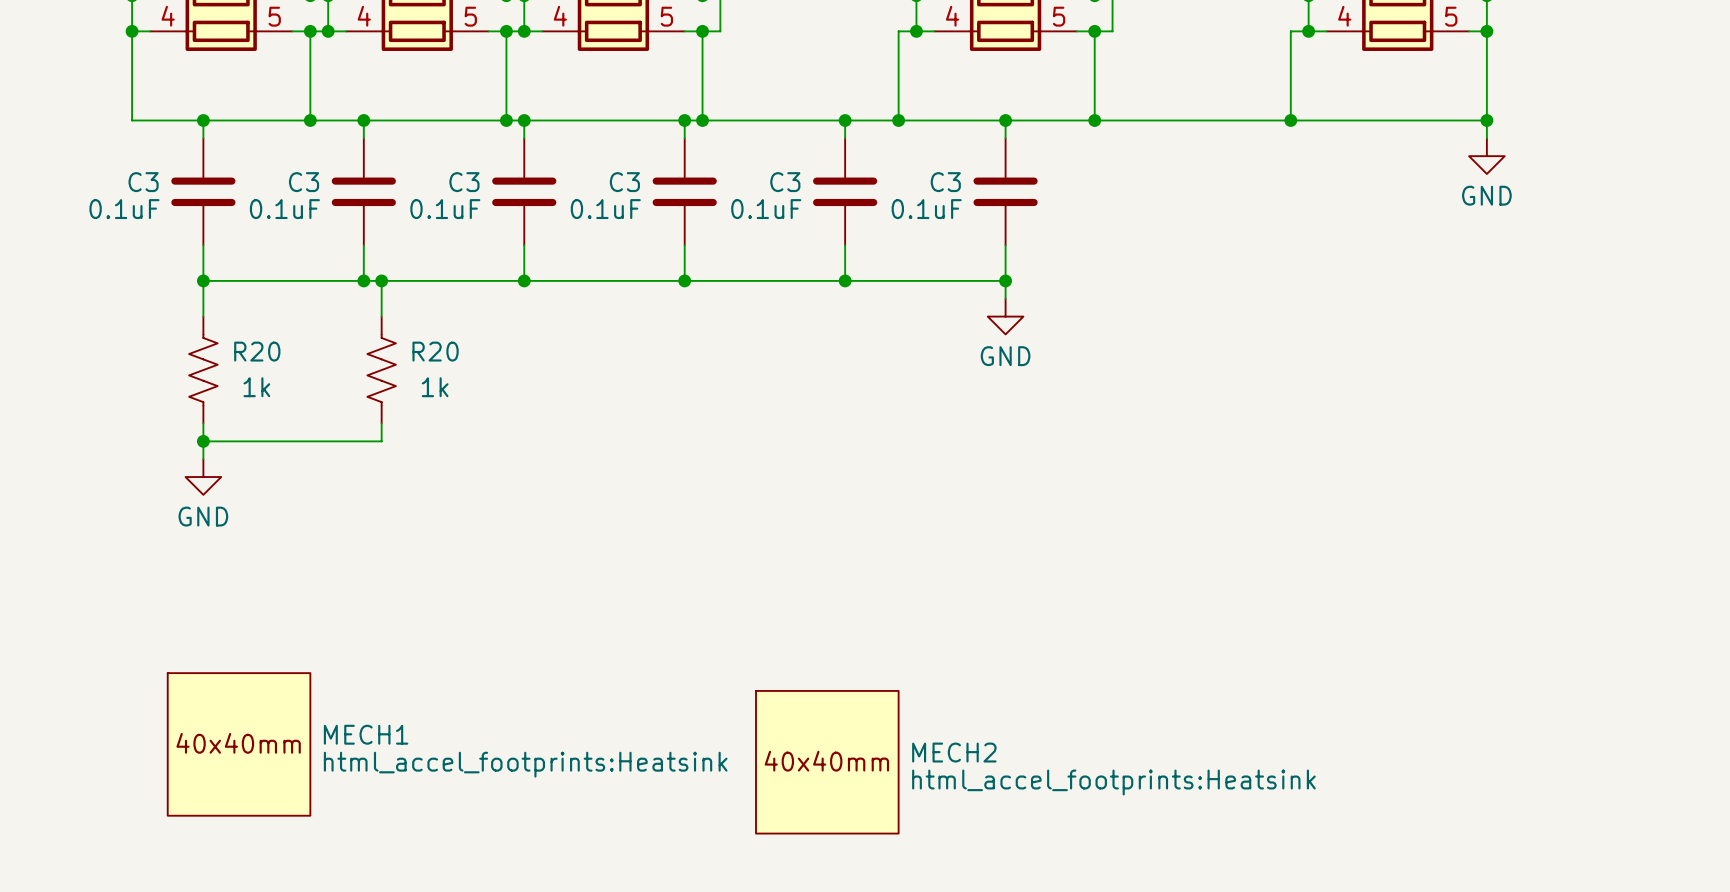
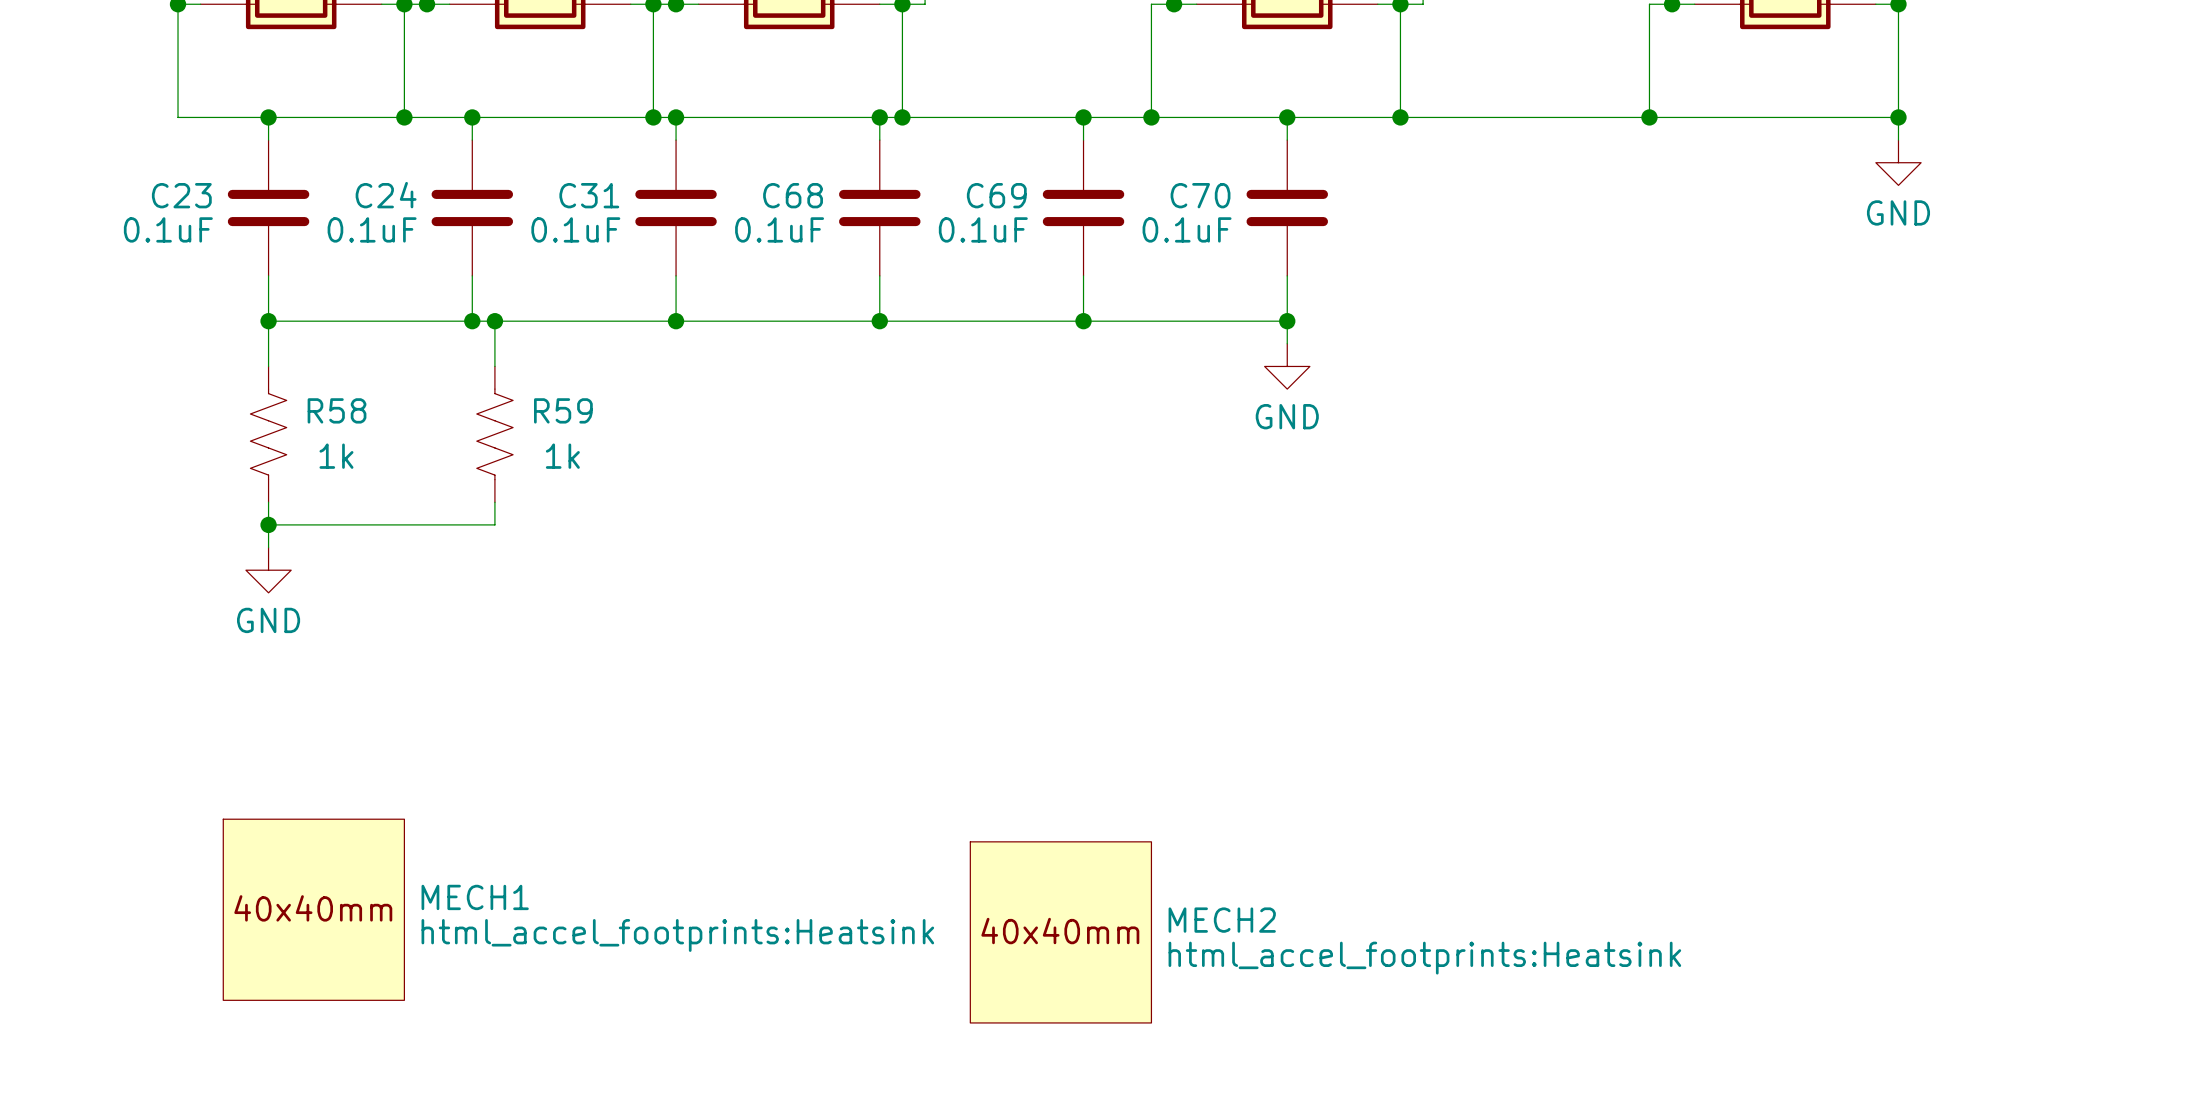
C3 name: C3 (143, 182) -> C23 (181, 195)
C3 name: C3 (304, 182) -> C24 (386, 195)
C3 name: C3 (464, 182) -> C31 (589, 195)
C3 name: C3 (624, 182) -> C68 (793, 195)
C3 name: C3 (785, 182) -> C69 (996, 195)
C3 name: C3 (945, 182) -> C70 (1200, 195)
R20 name: R20 (257, 351) -> R58 (337, 410)
R20 name: R20 (435, 351) -> R59 (563, 410)

